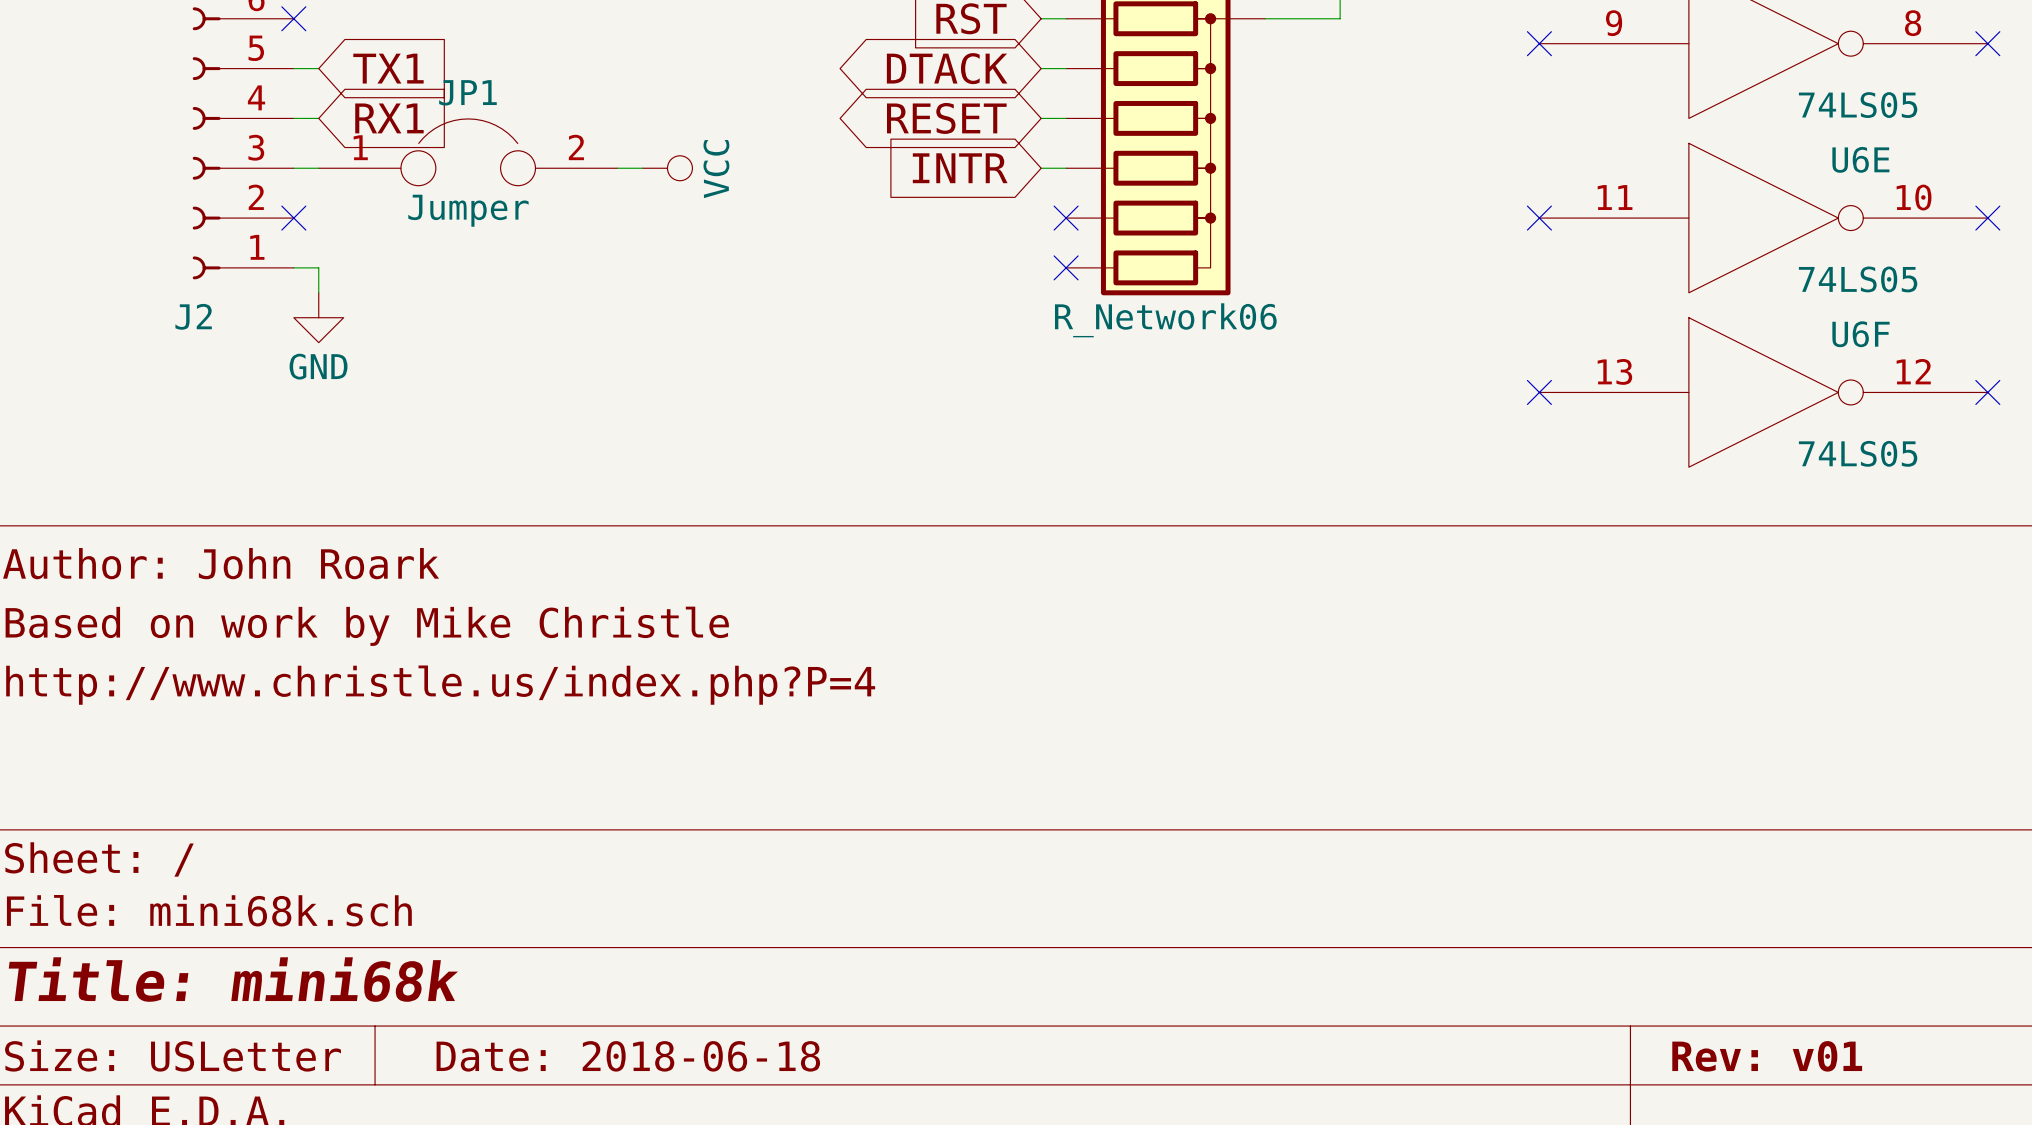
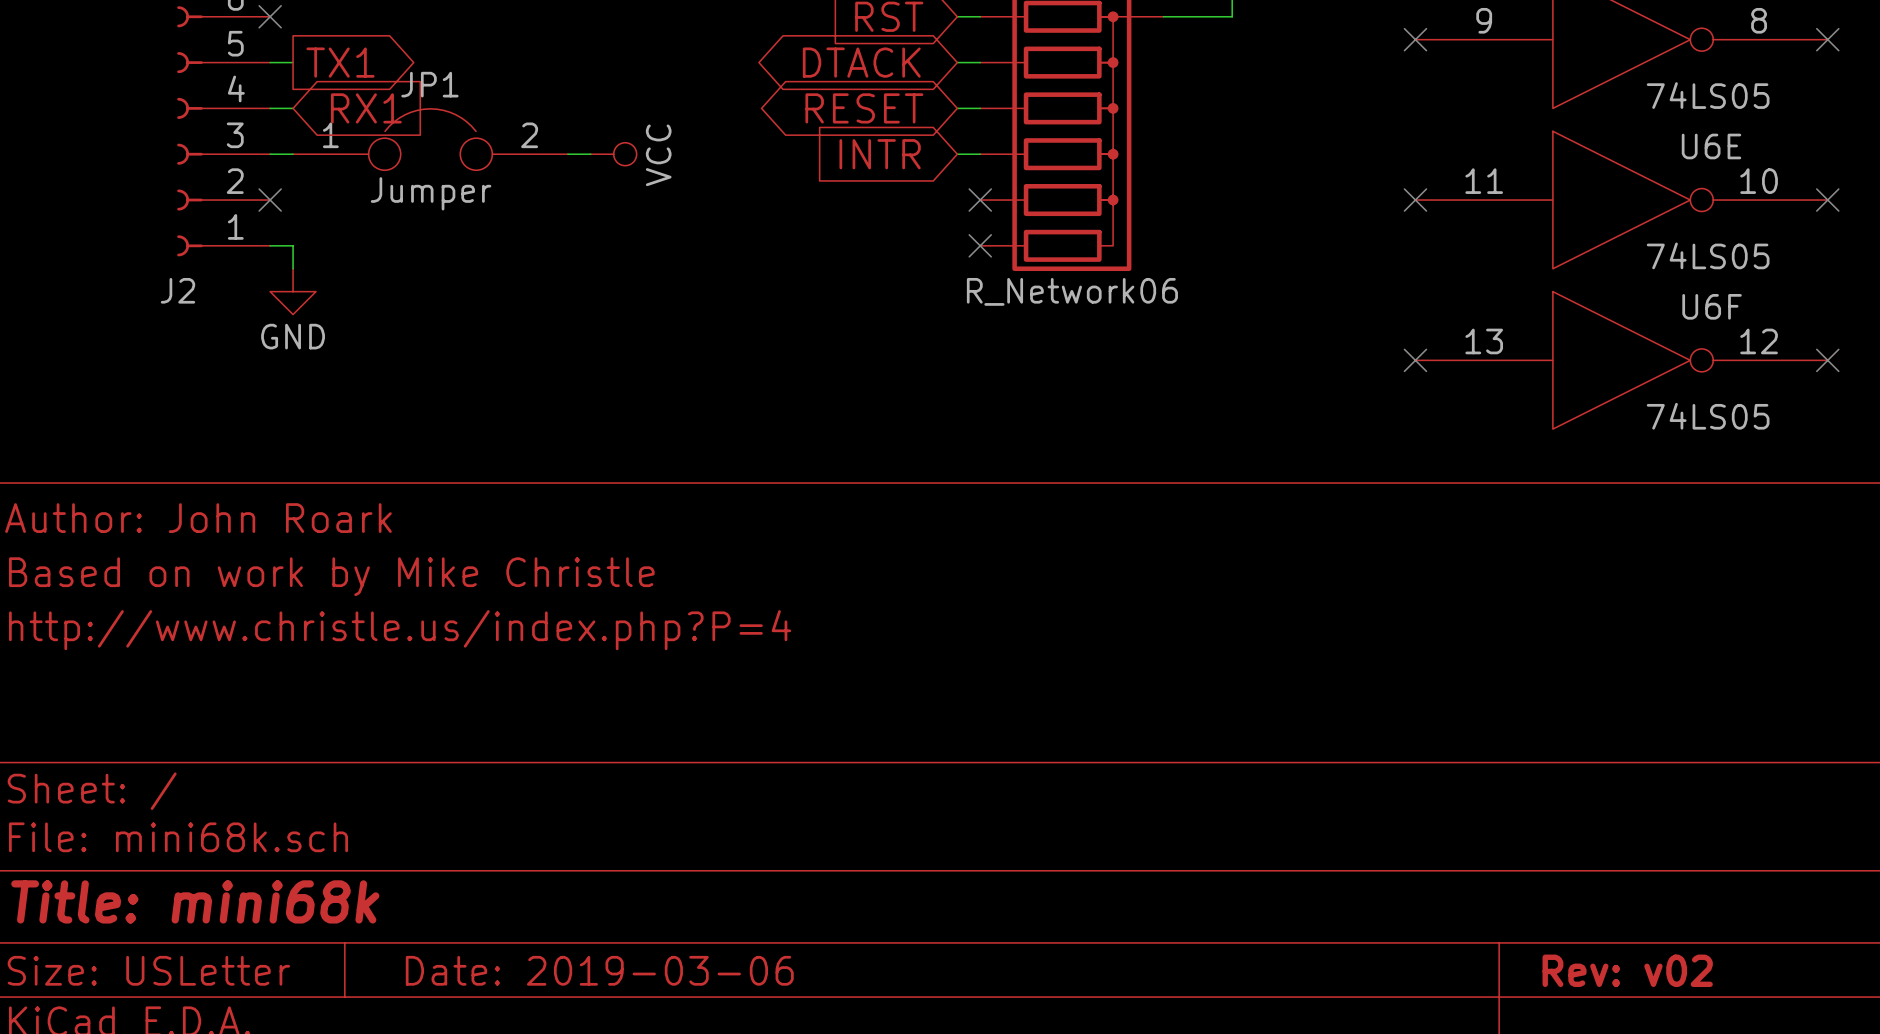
global label shape: input (388, 68) -> output (340, 62)
title block: Date: 2018-06-18 (628, 1056) -> Date: 2019-03-06 (599, 970)
title block: Rev: v01 (1767, 1056) -> Rev: v02 (1627, 970)

